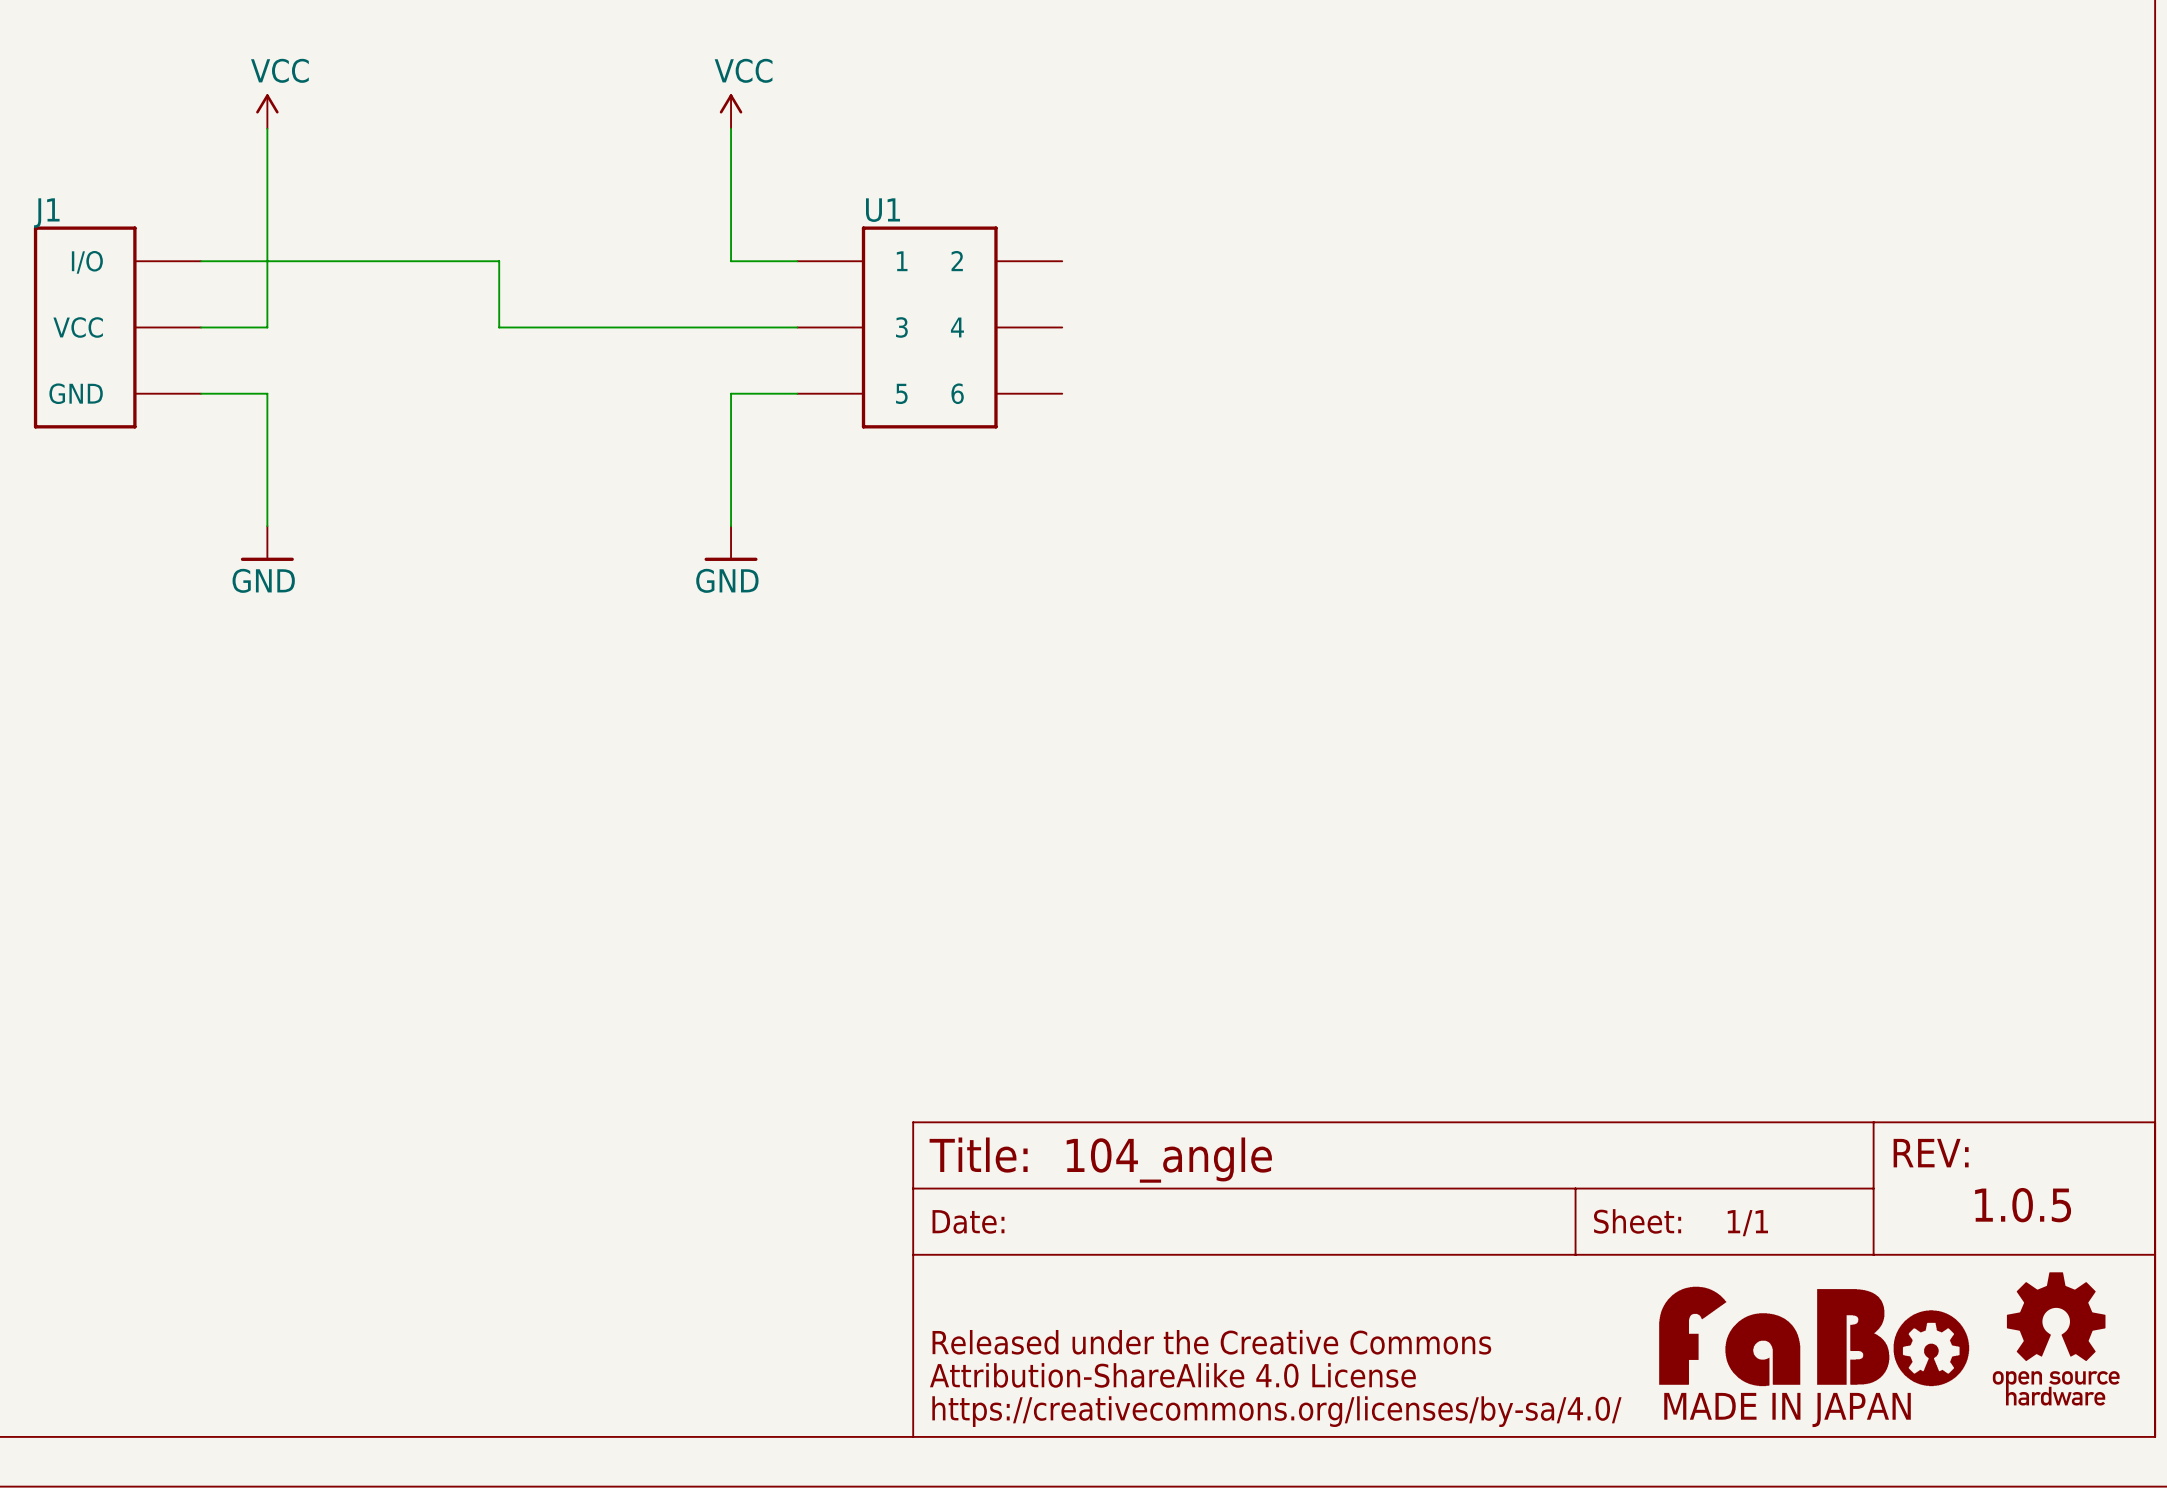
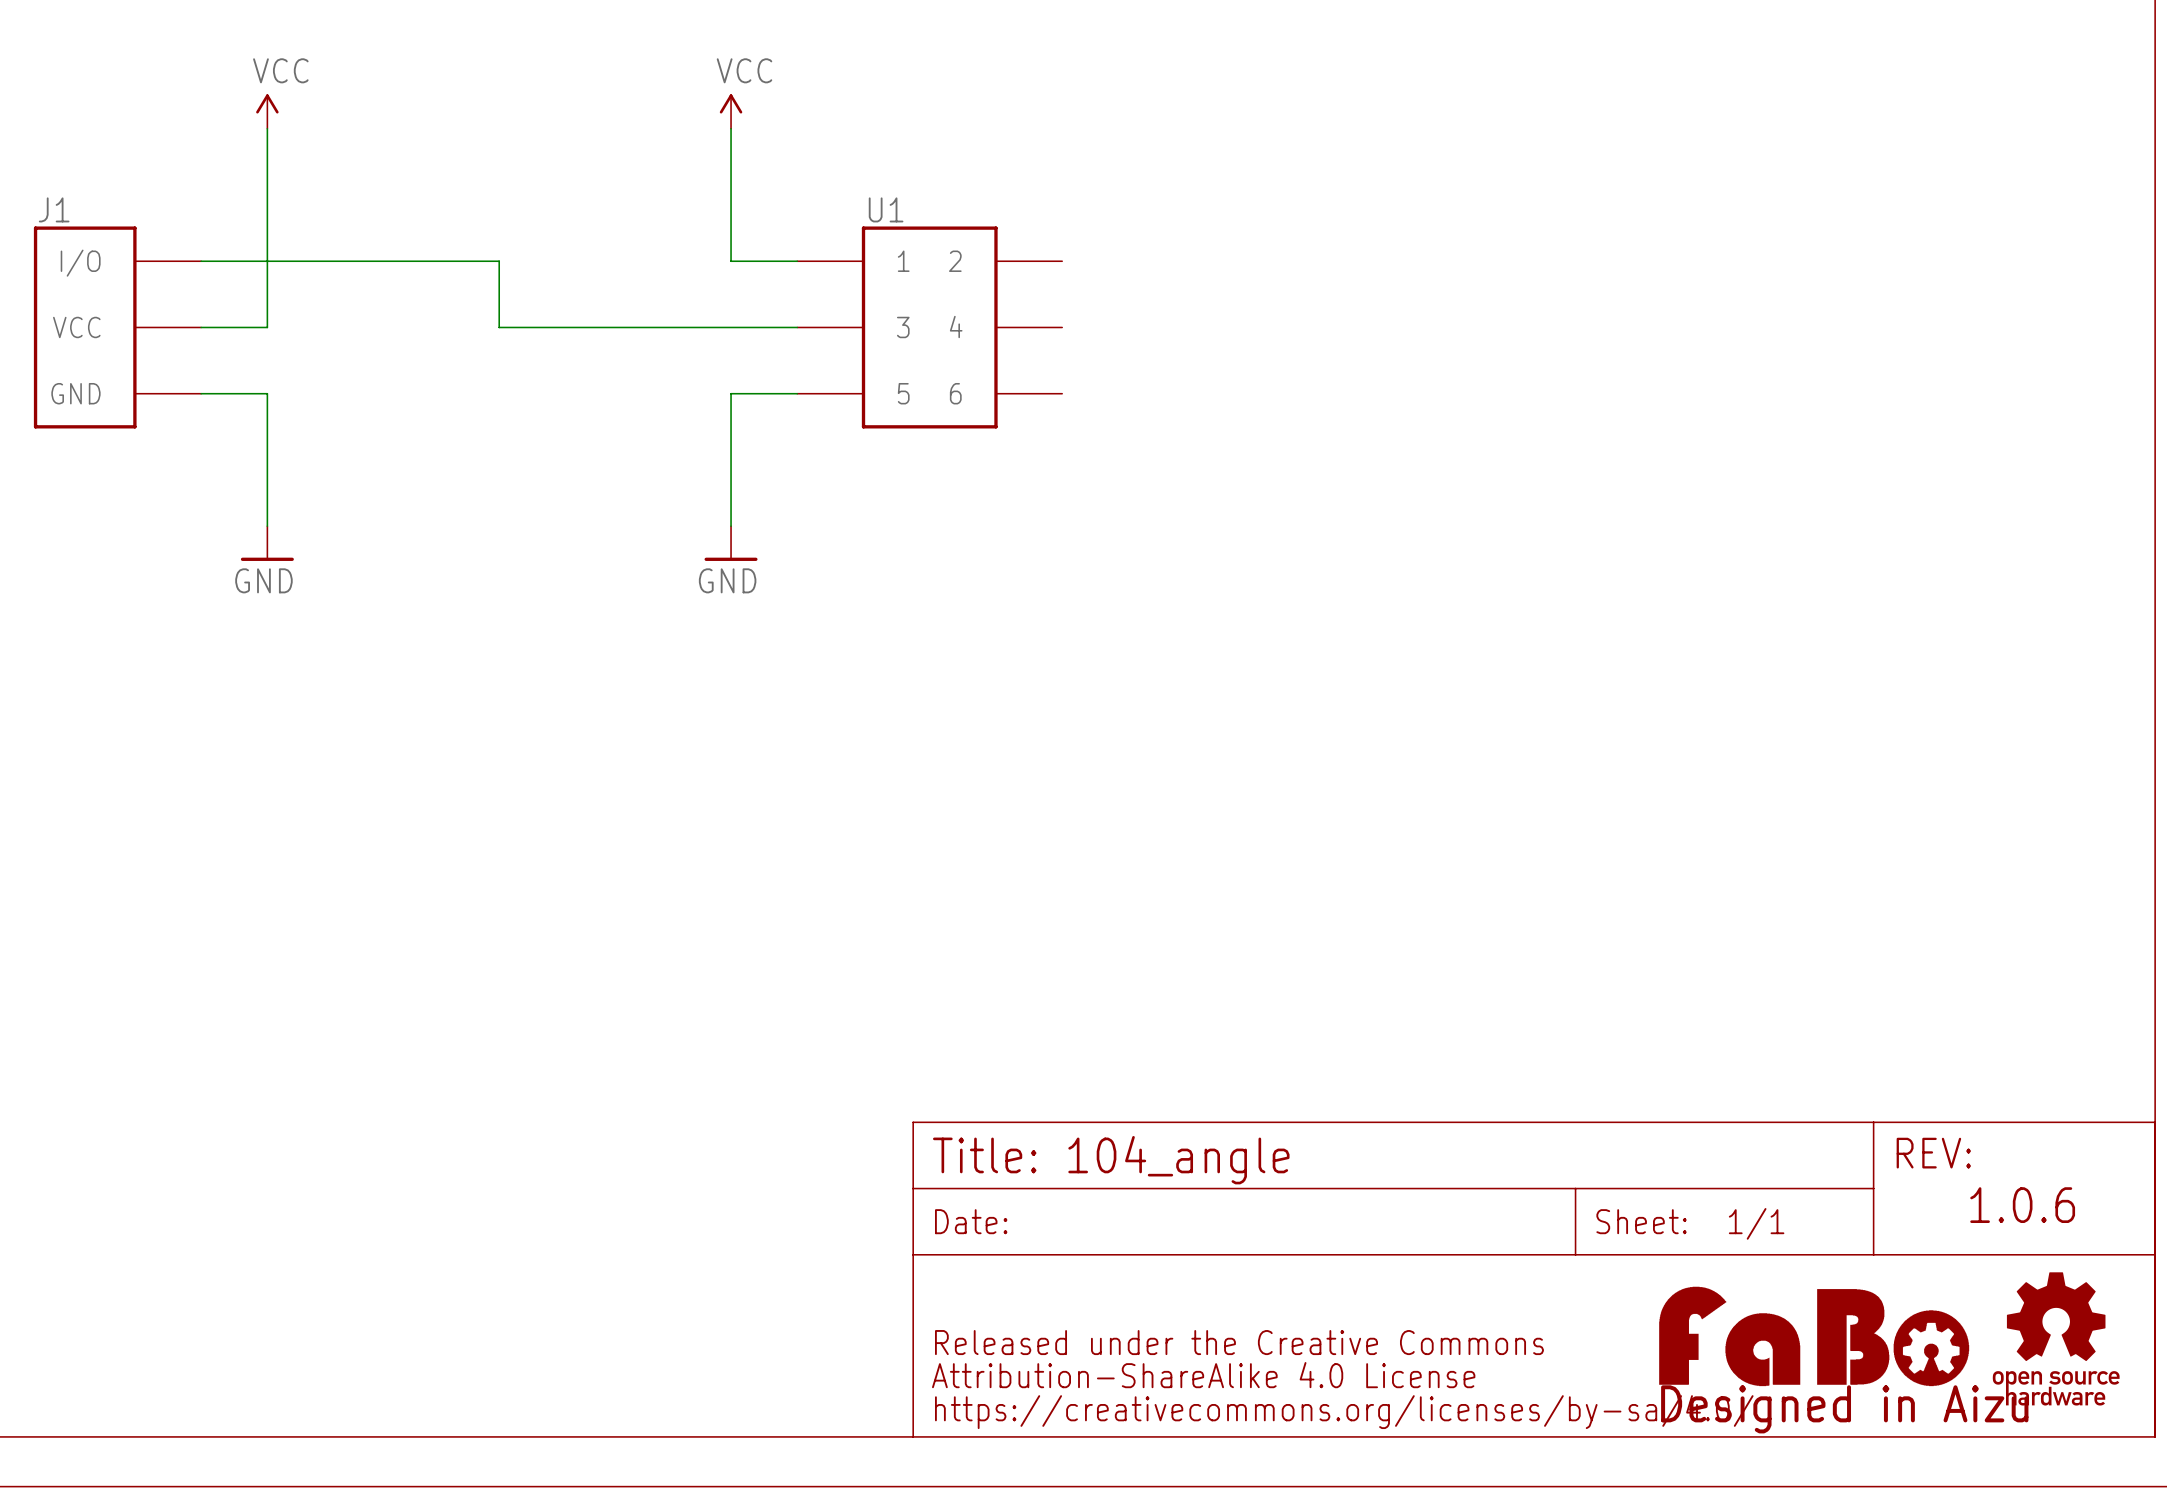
text: 1.0.5 (2023, 1205) -> 1.0.6 (2022, 1205)
part text: none -> Designed in Aizu (1844, 1409)
part text: MADE IN JAPAN (1787, 1409) -> none

